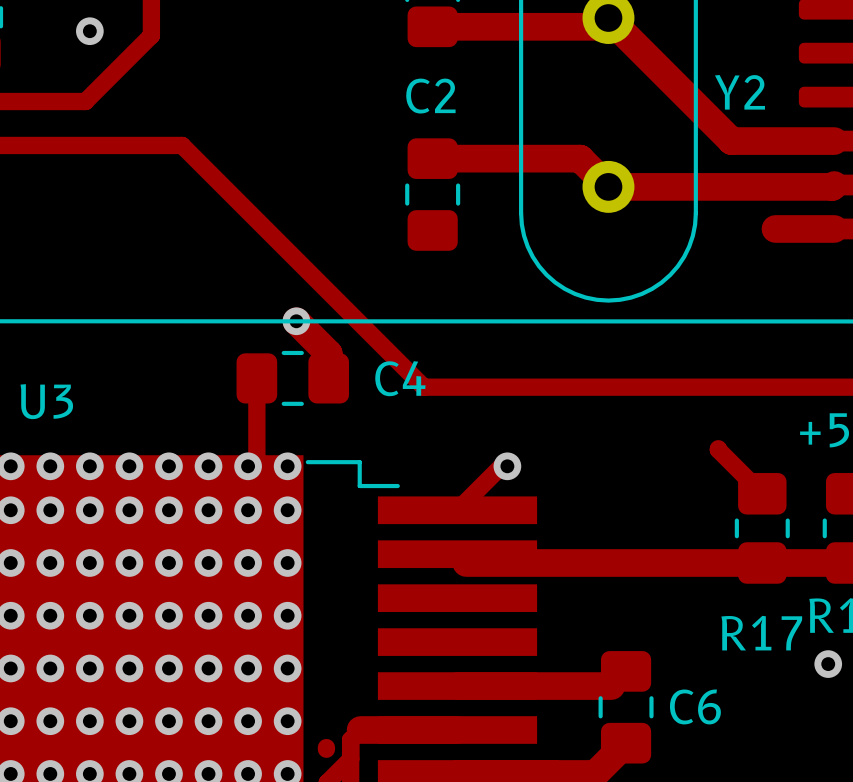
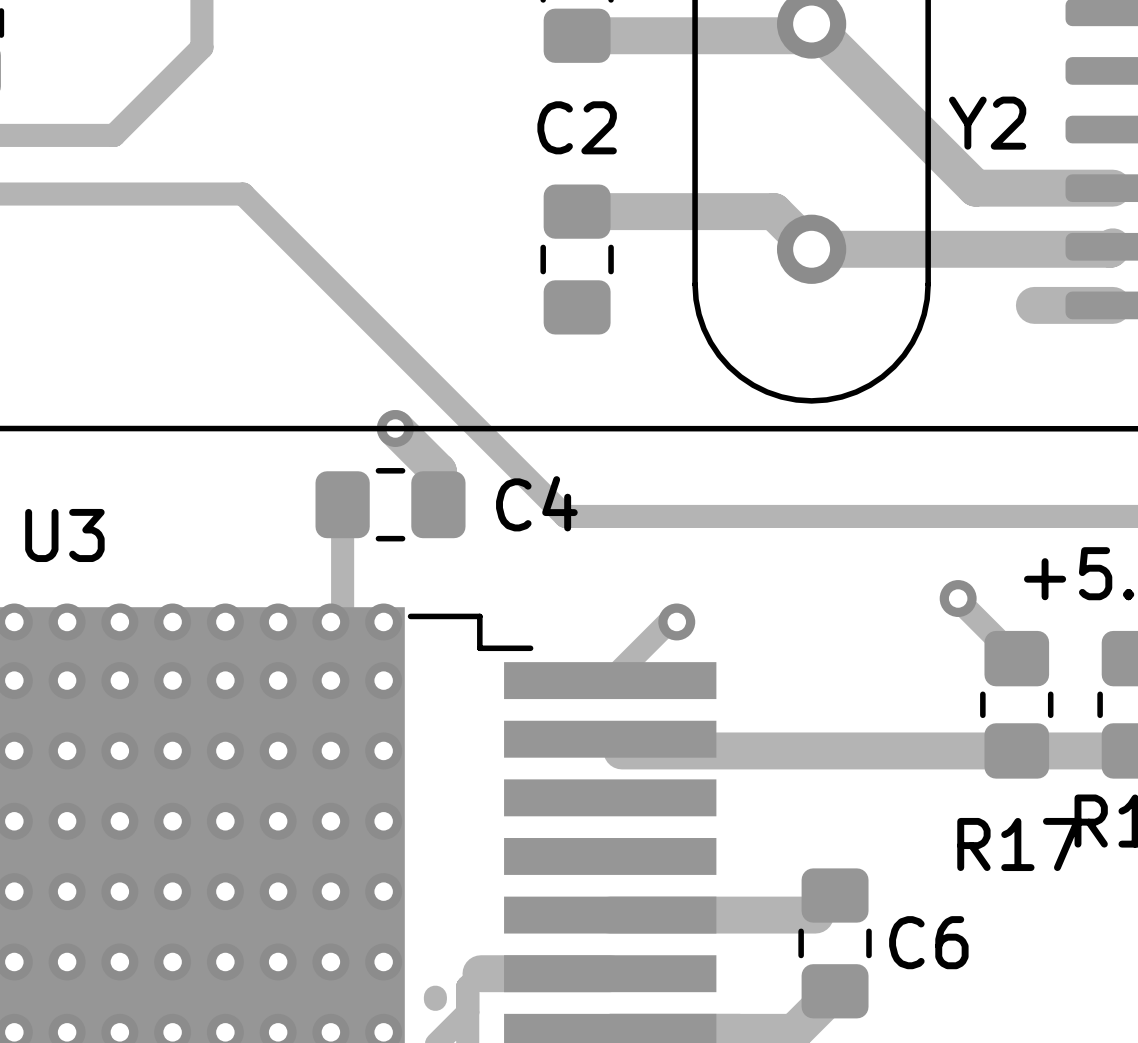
via: (89, 31) -> none
via: none -> (958, 598)
via: (828, 664) -> none

